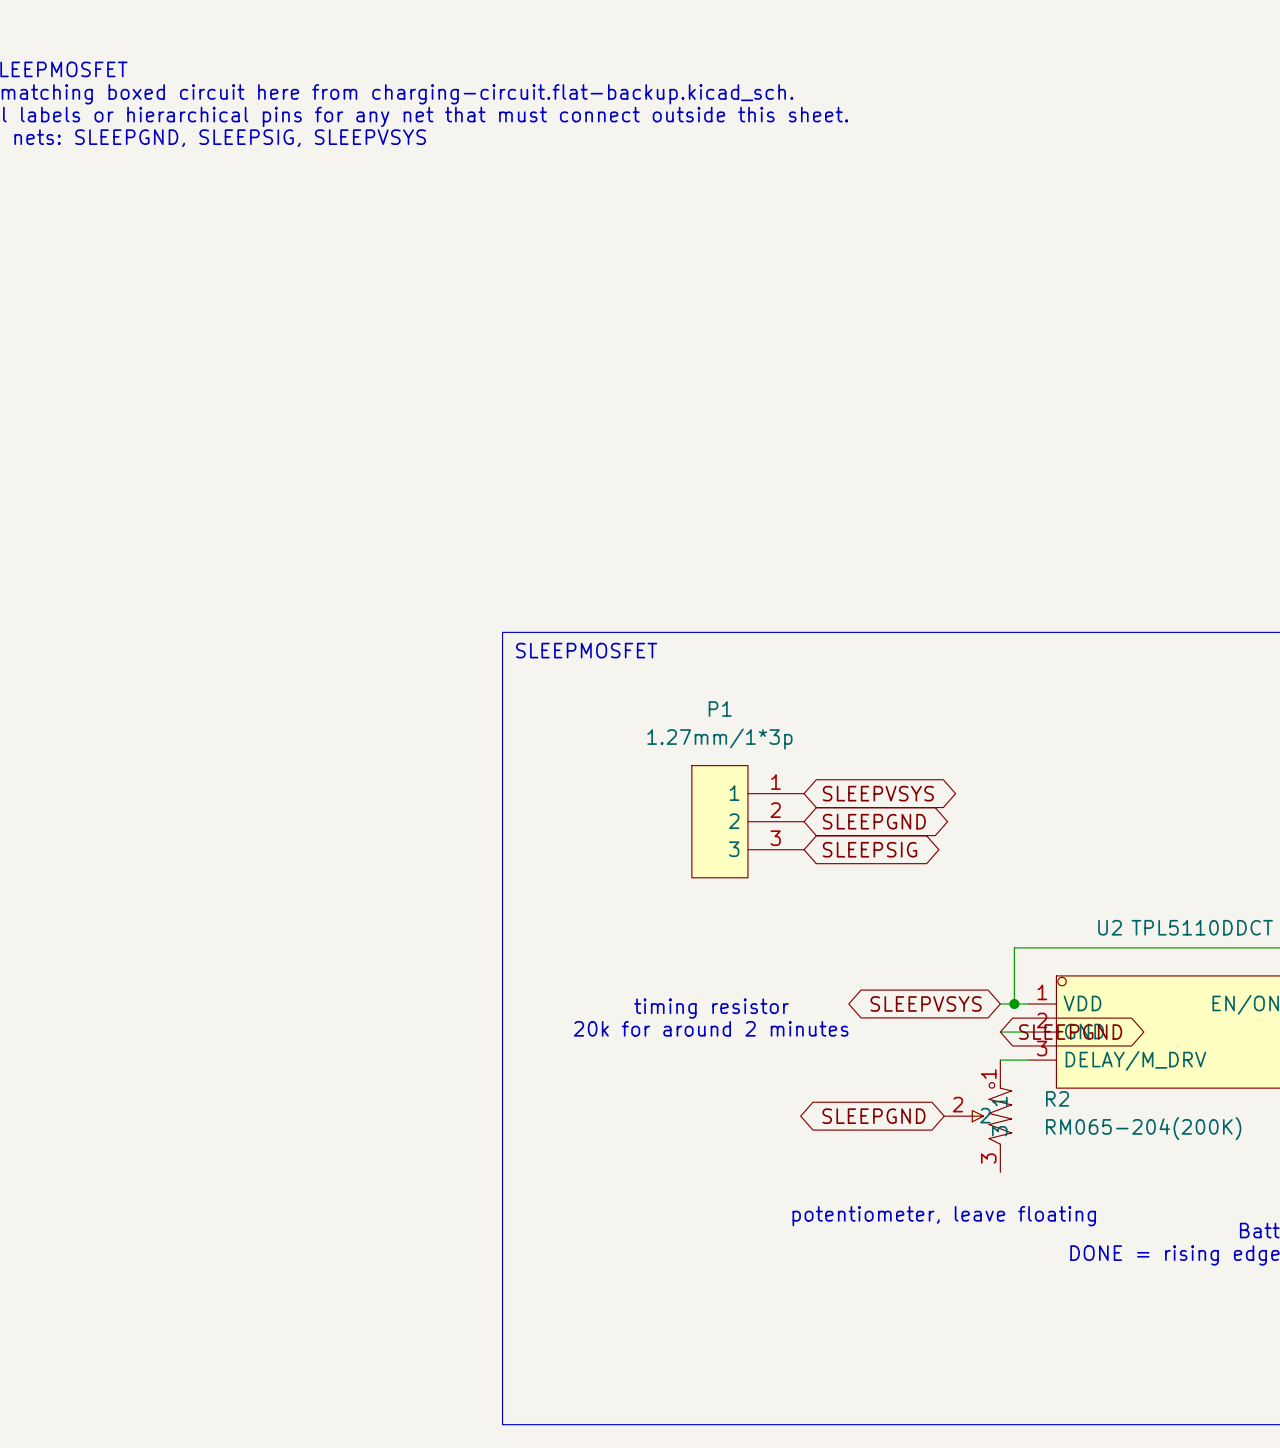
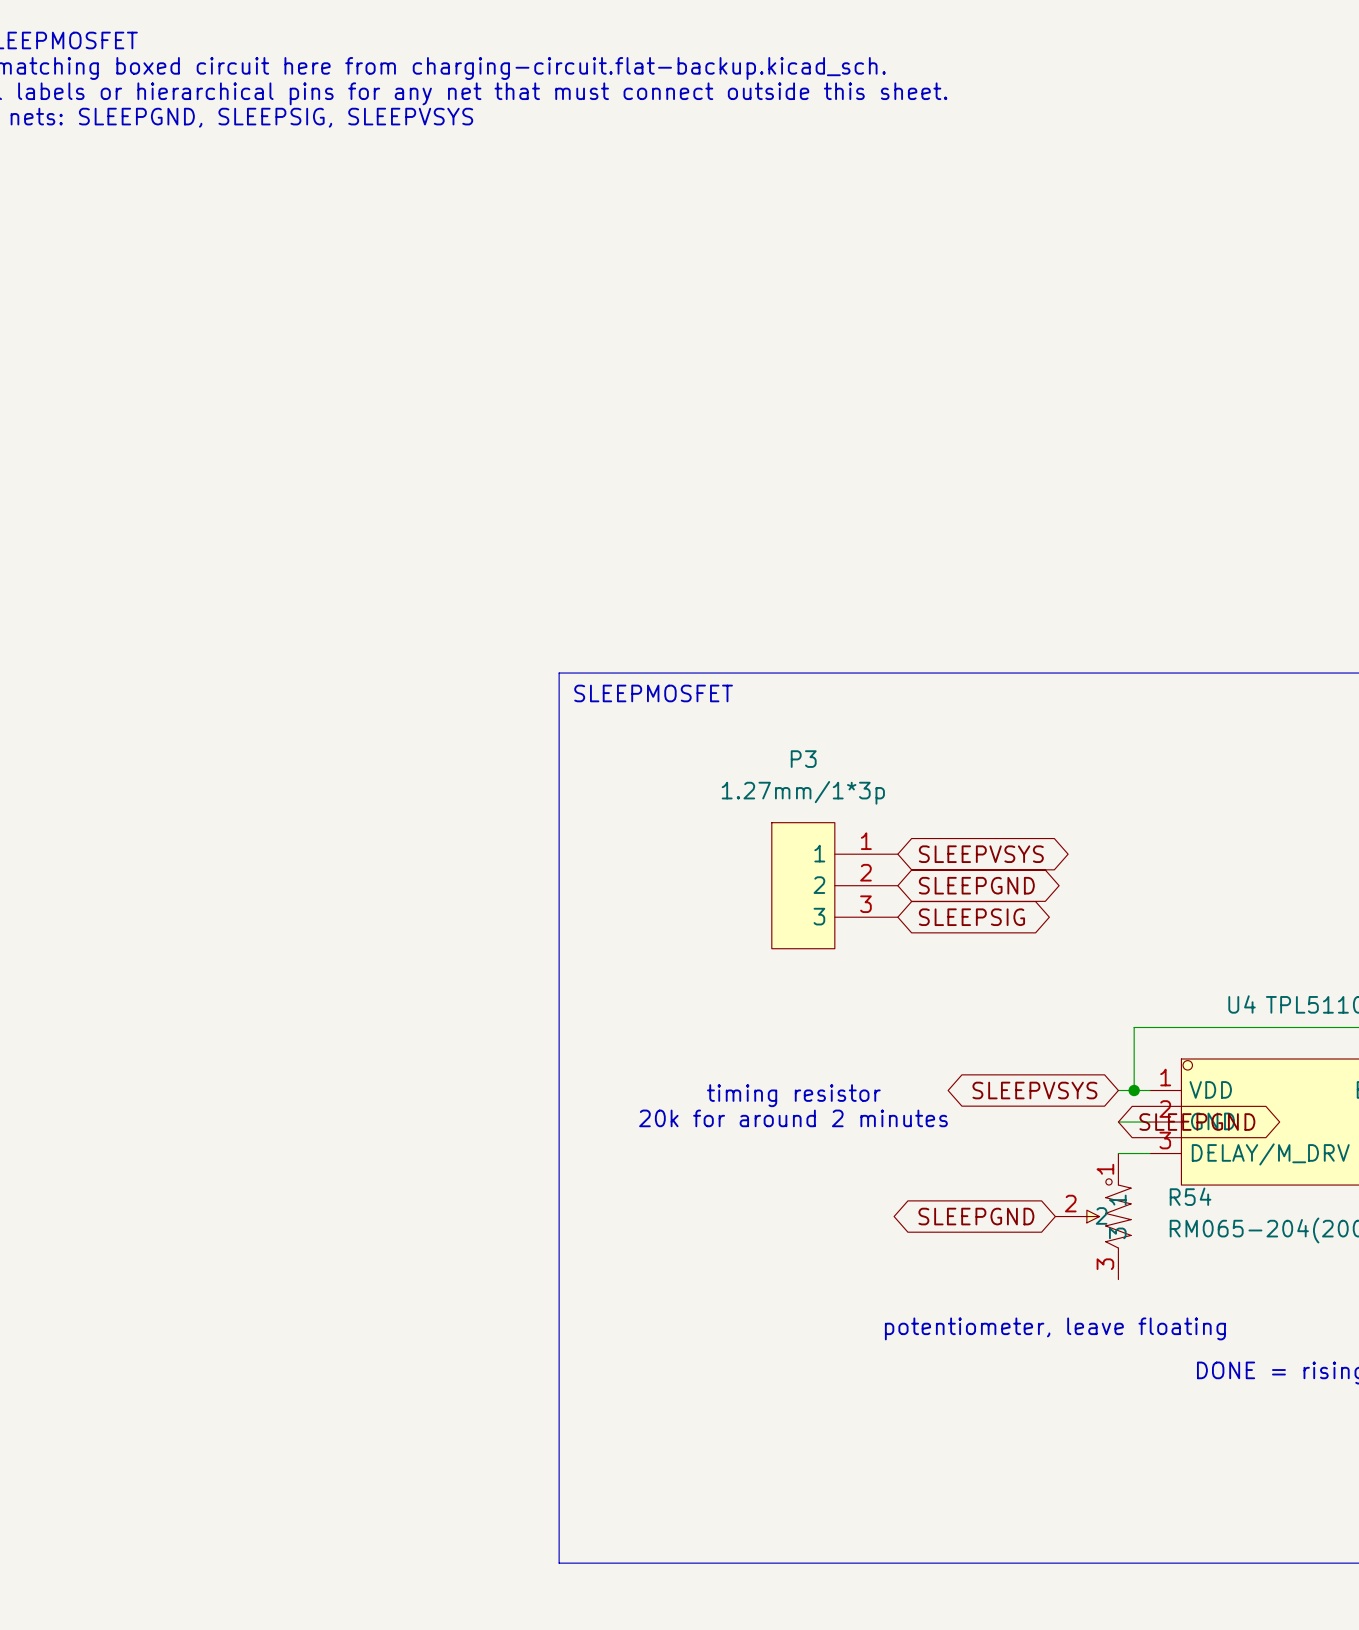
P1 name: P1 (720, 709) -> P3 (803, 759)
U2 name: U2 (1110, 927) -> U4 (1242, 1004)
R2 name: R2 (1057, 1098) -> R54 (1190, 1196)

